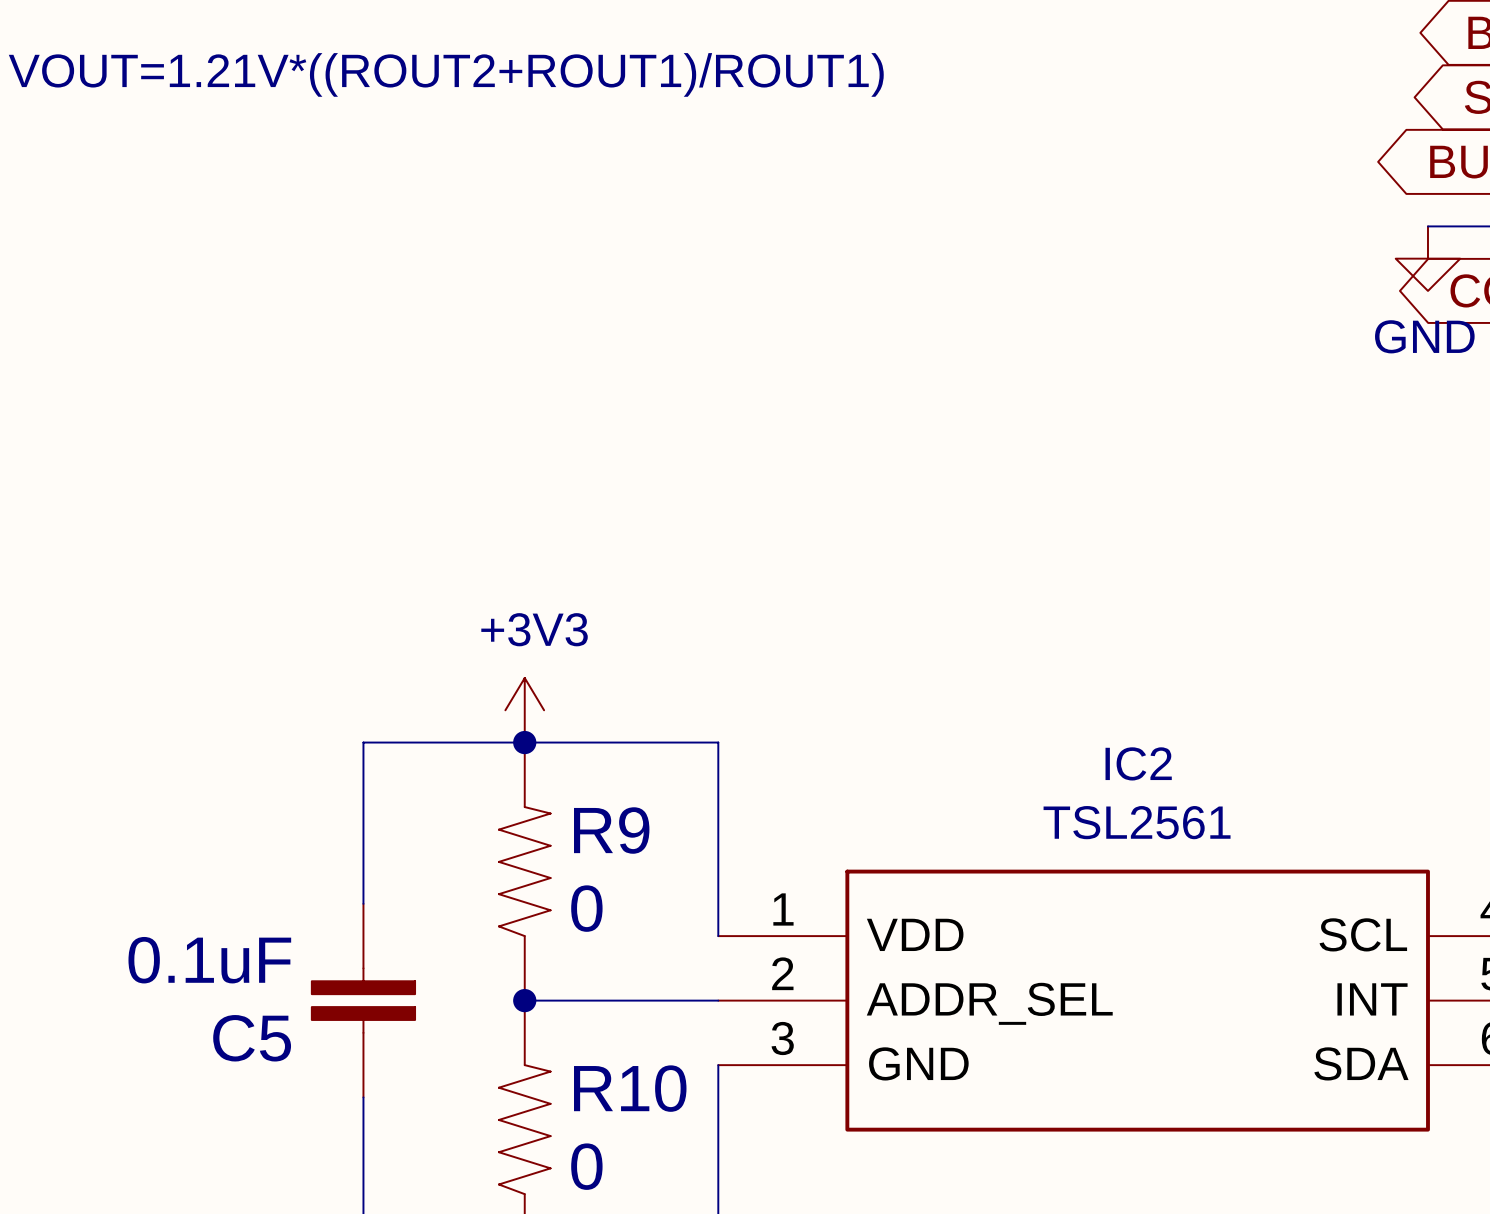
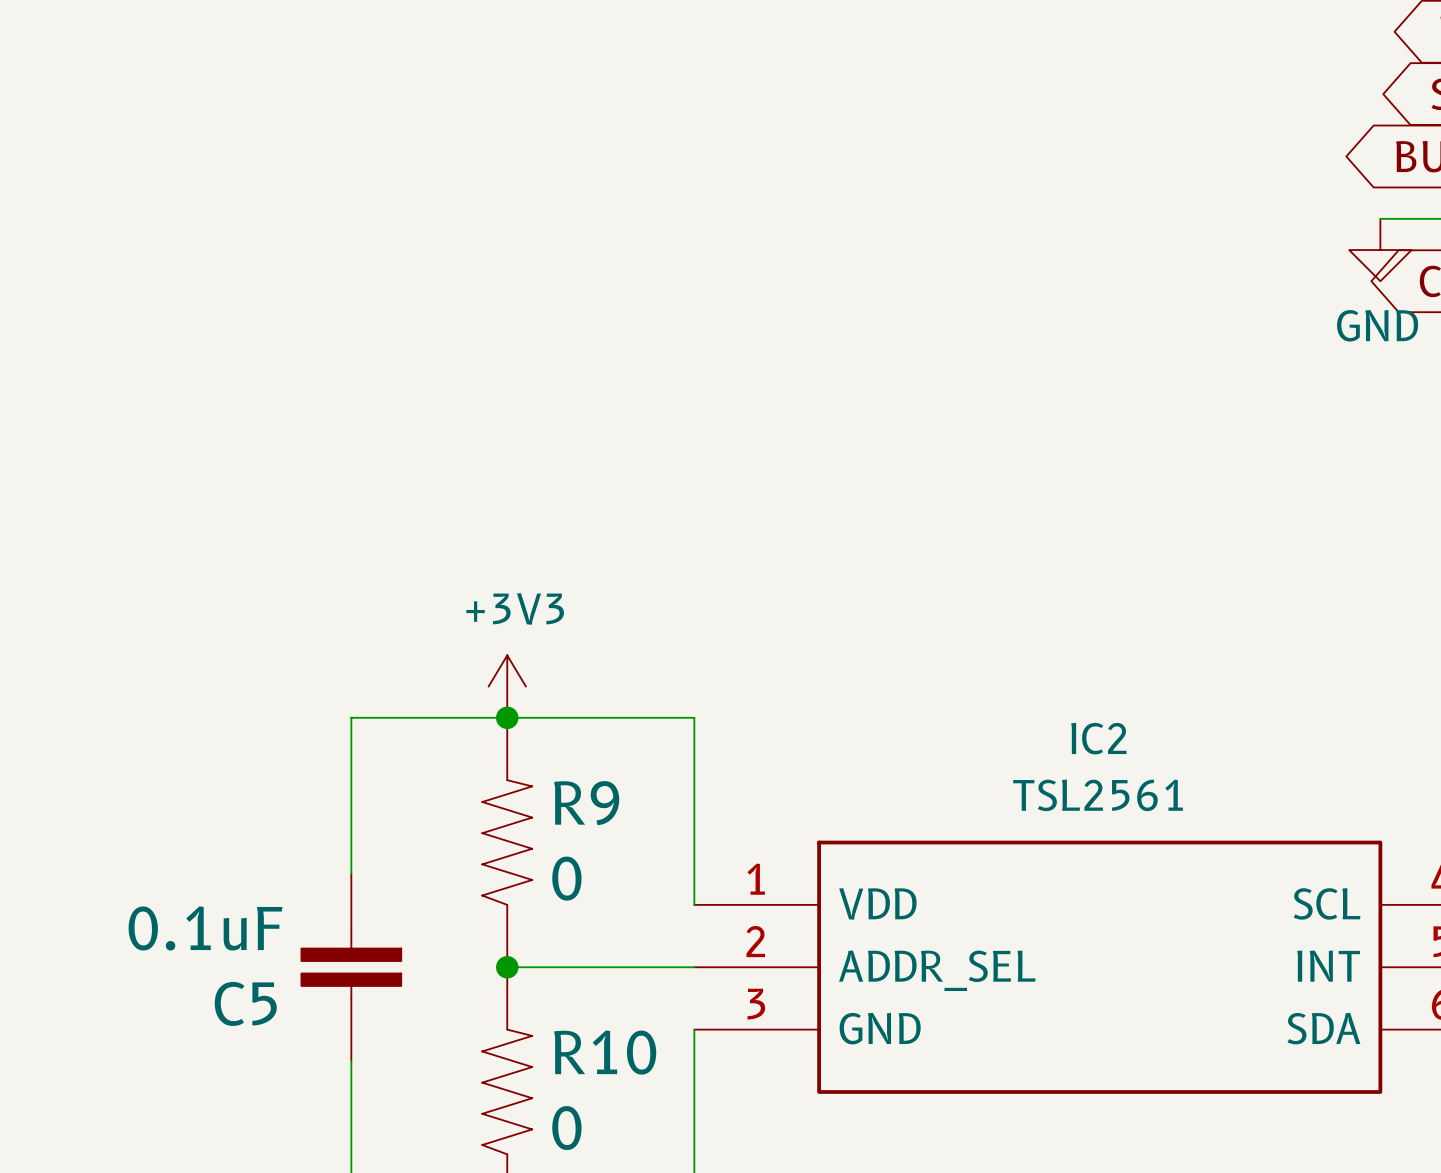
text: VOUT=1.21V*((ROUT2+ROUT1)/ROUT1) (446, 74) -> none

